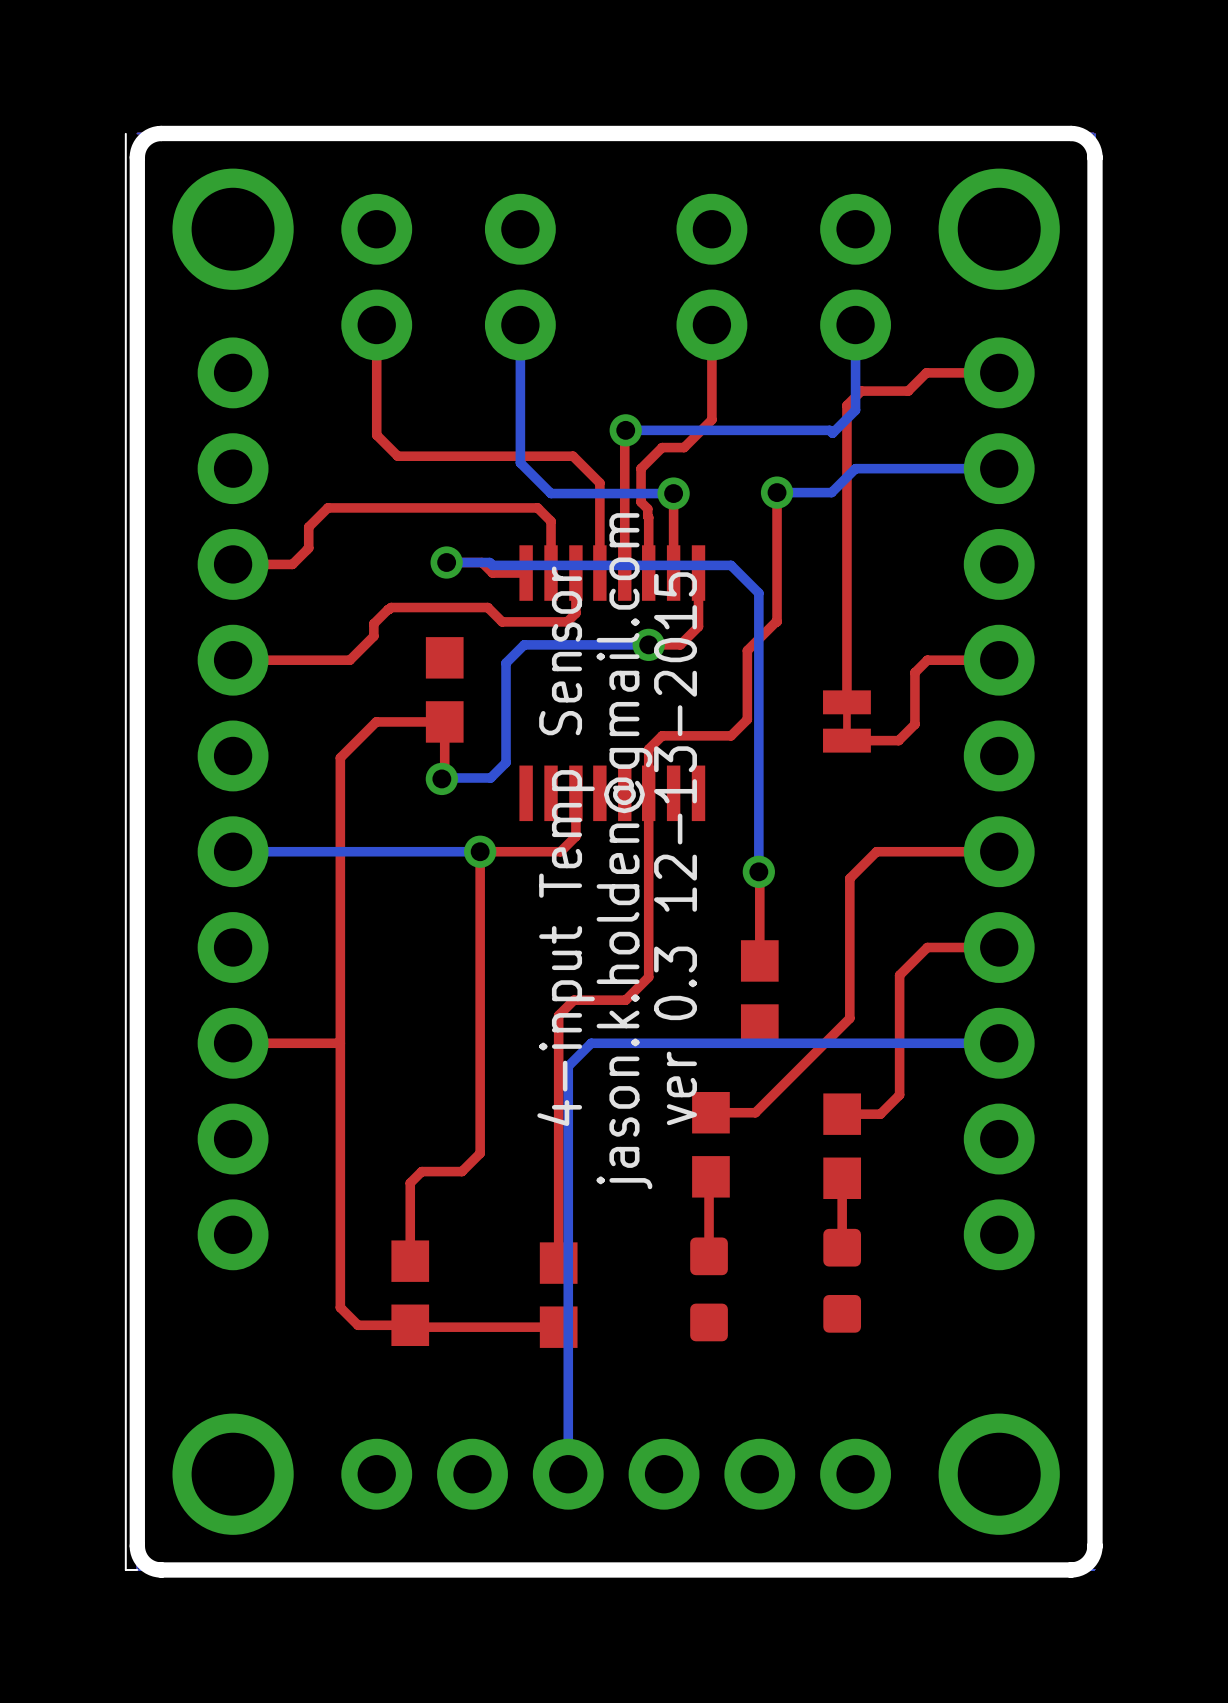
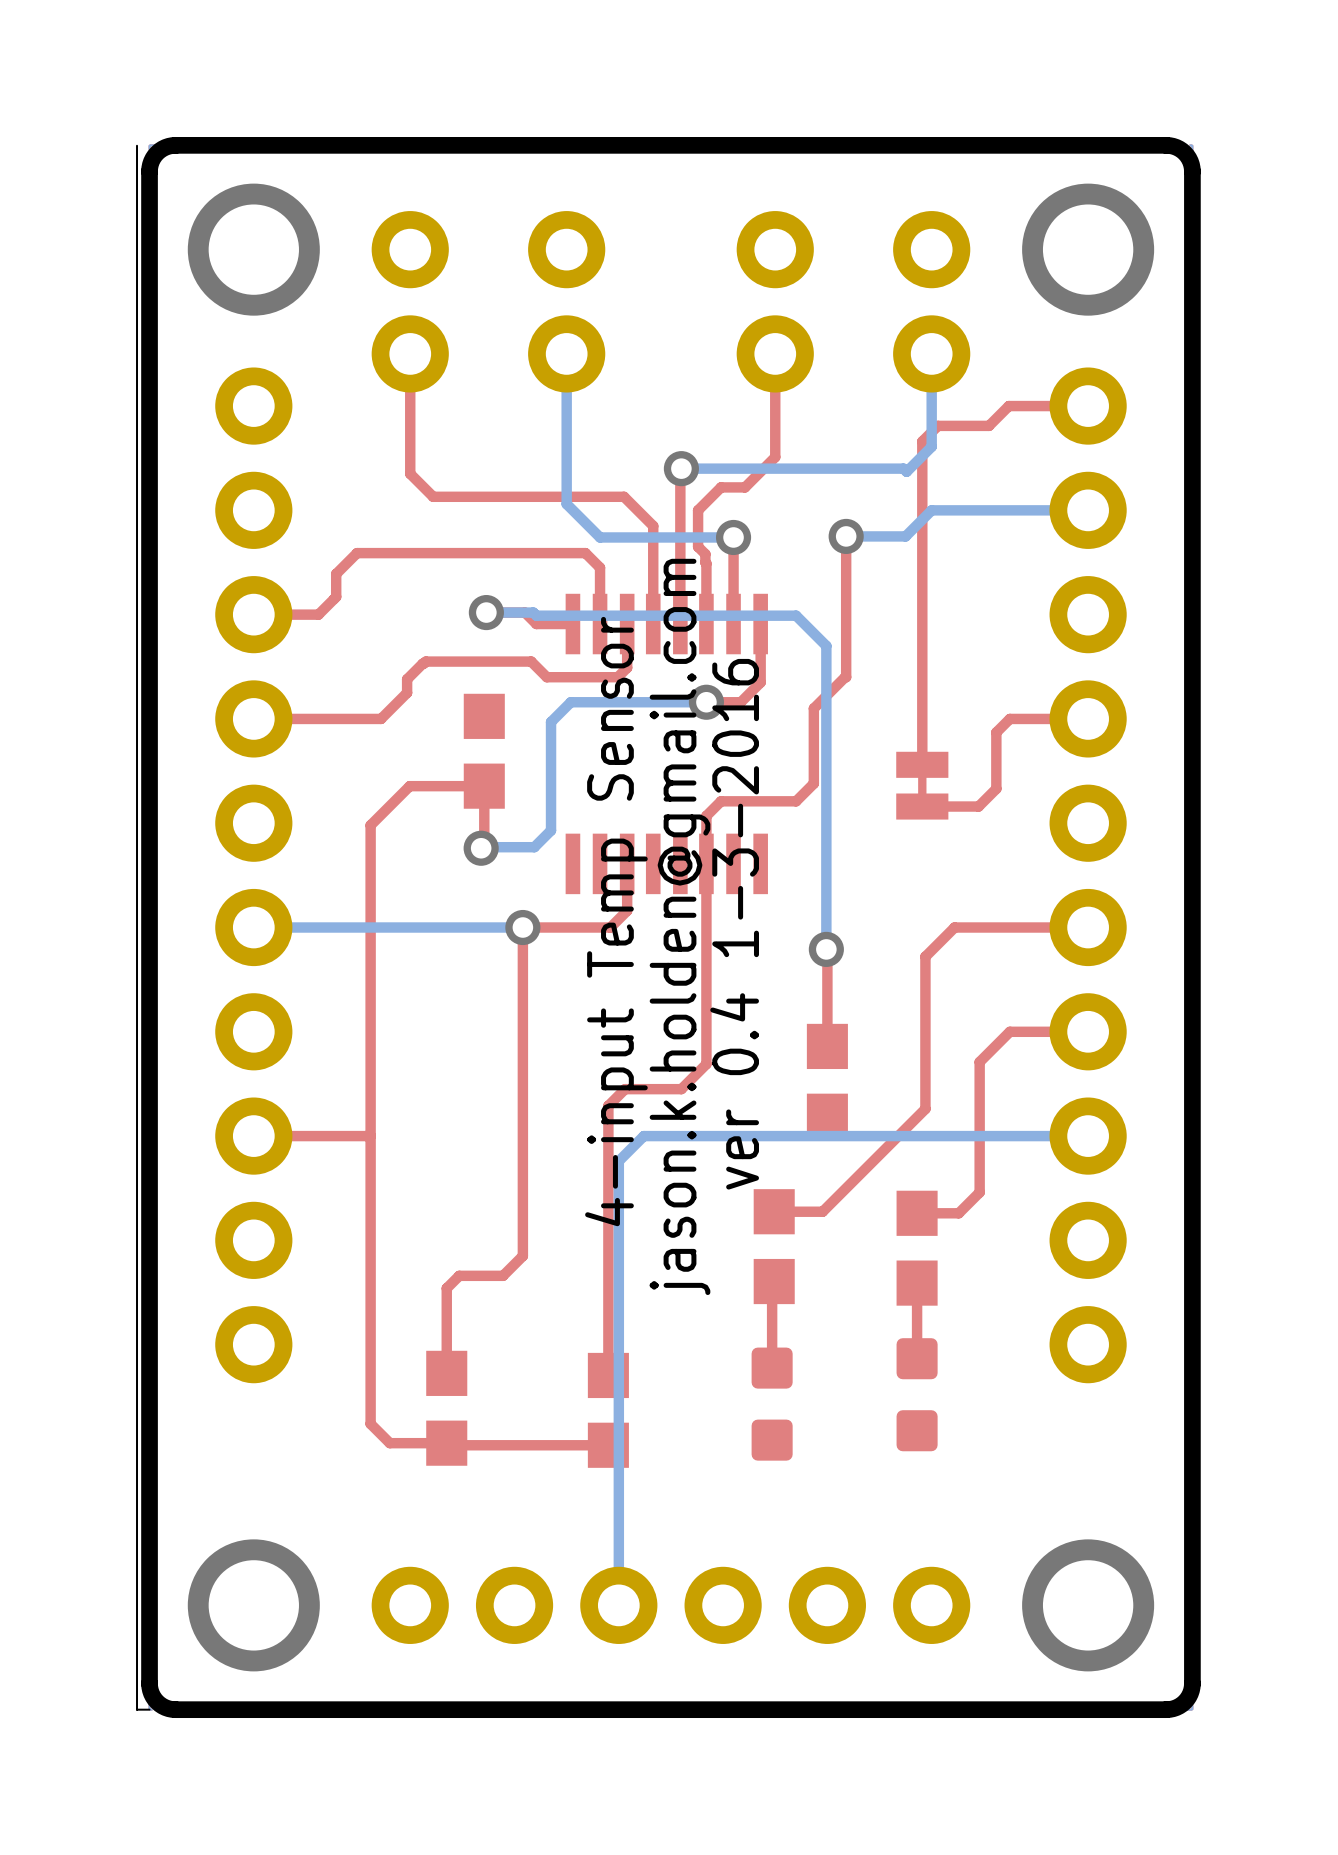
text: ver 0.3 12-13-2015 (675, 848) -> ver 0.4 1-3-2016 (734, 924)

